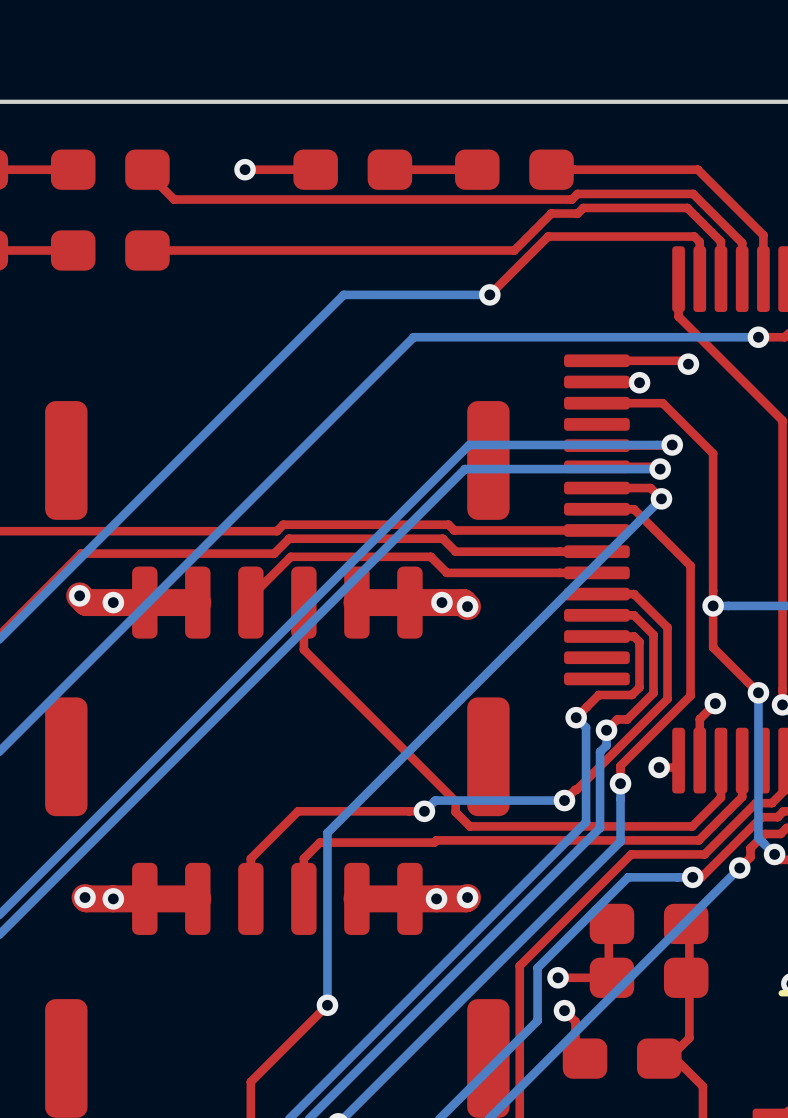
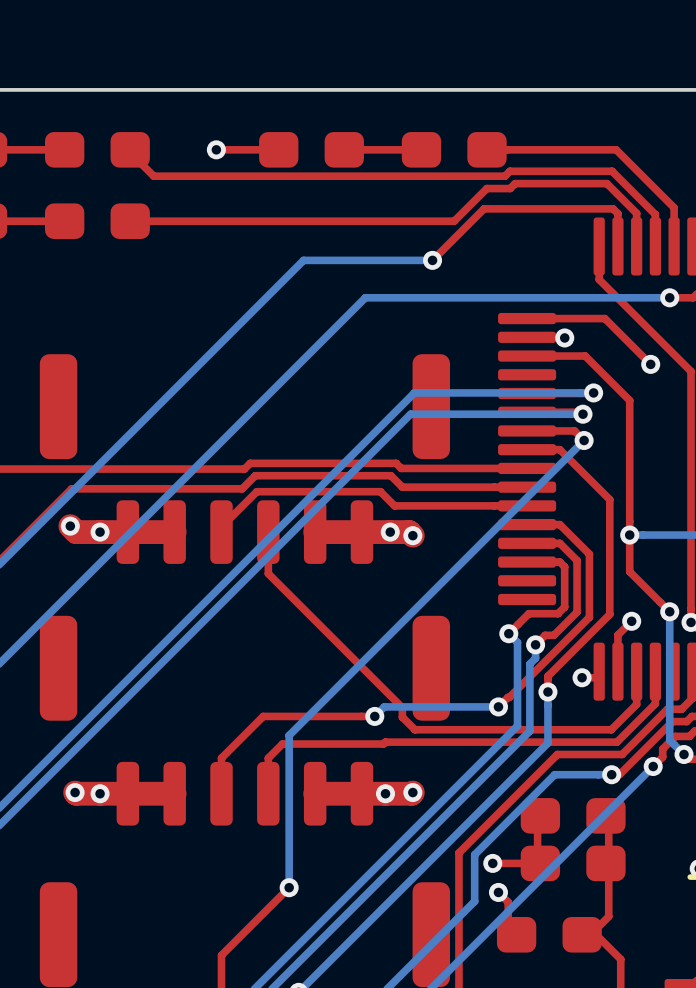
top track: none -> (607, 321) (650, 364)
via position: (688, 364) -> (650, 364)

